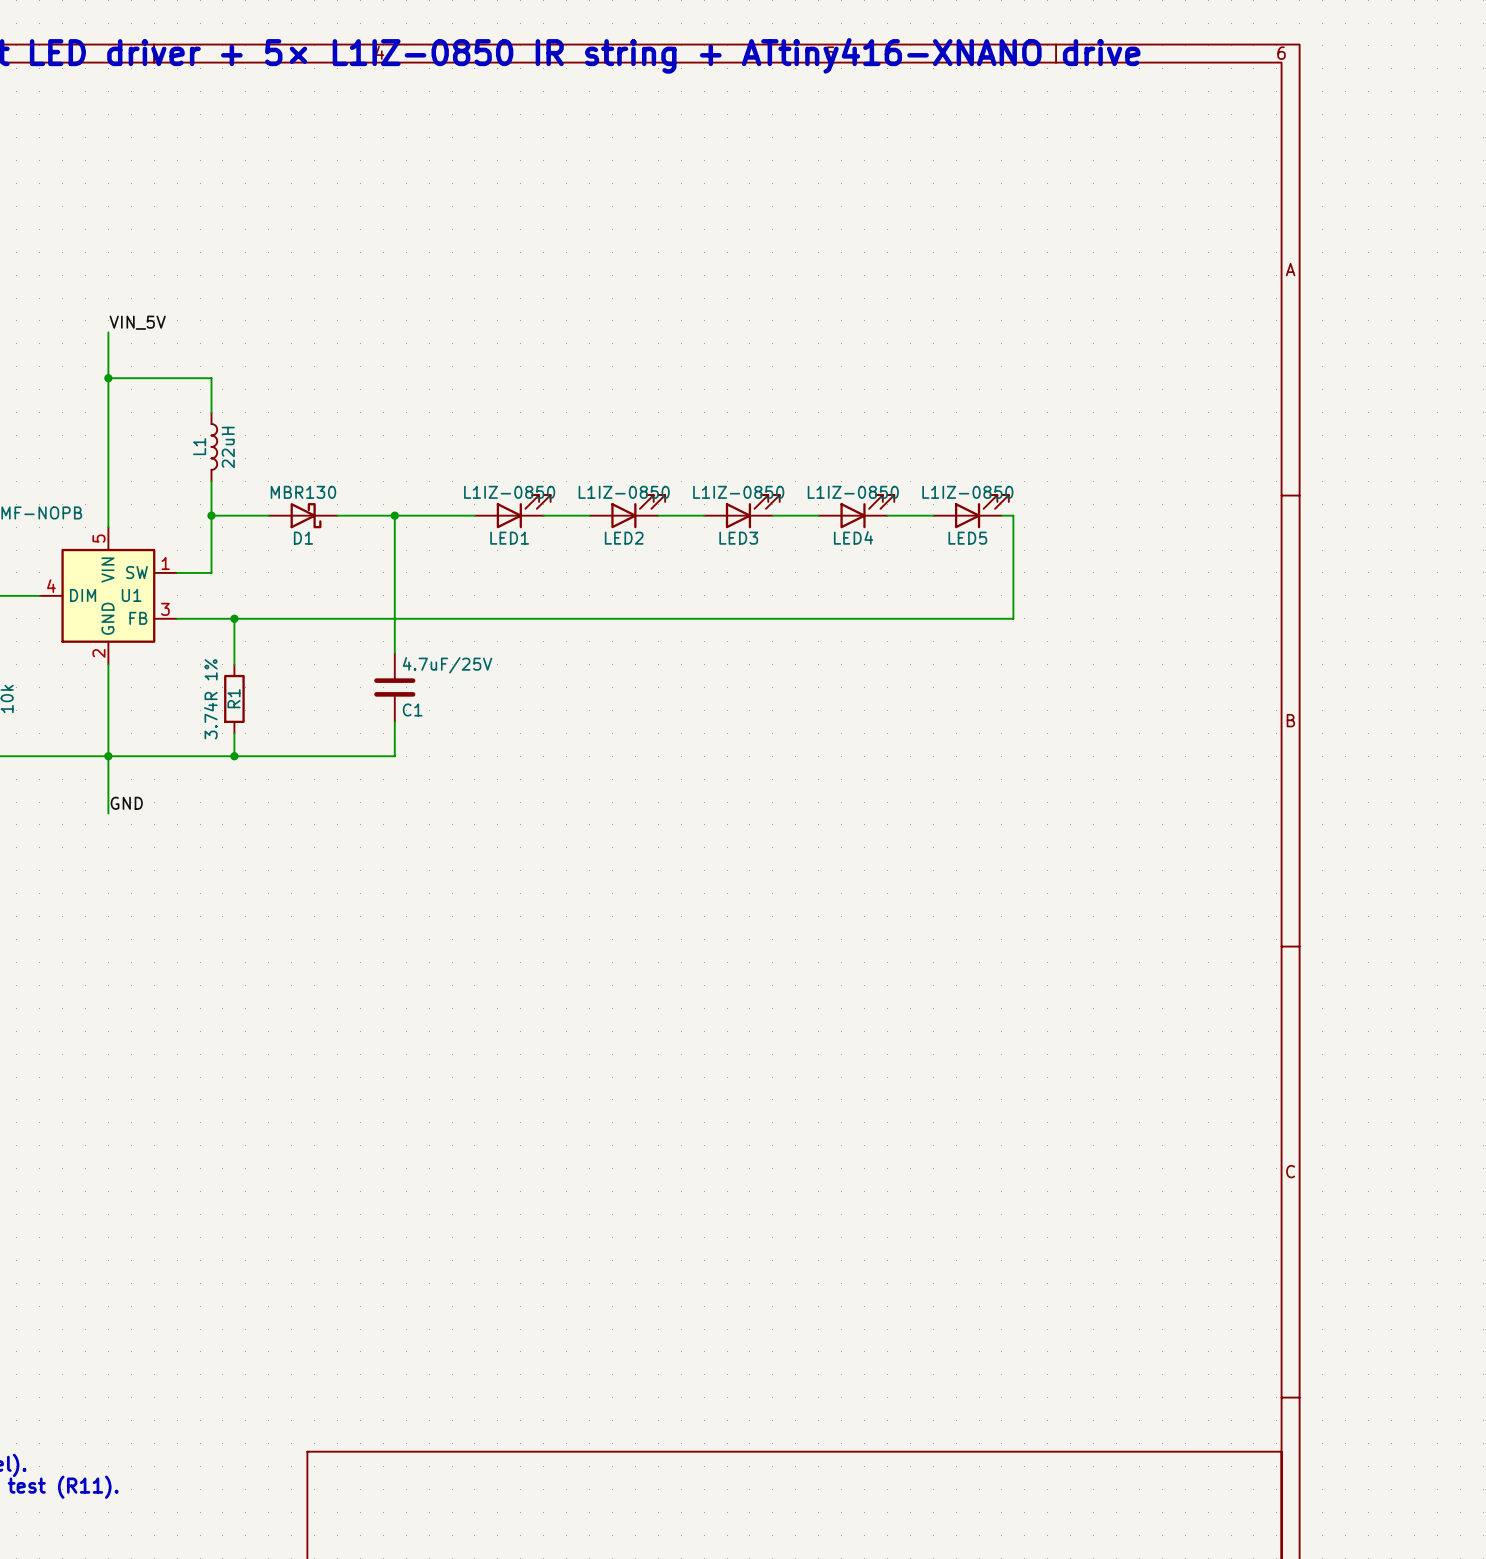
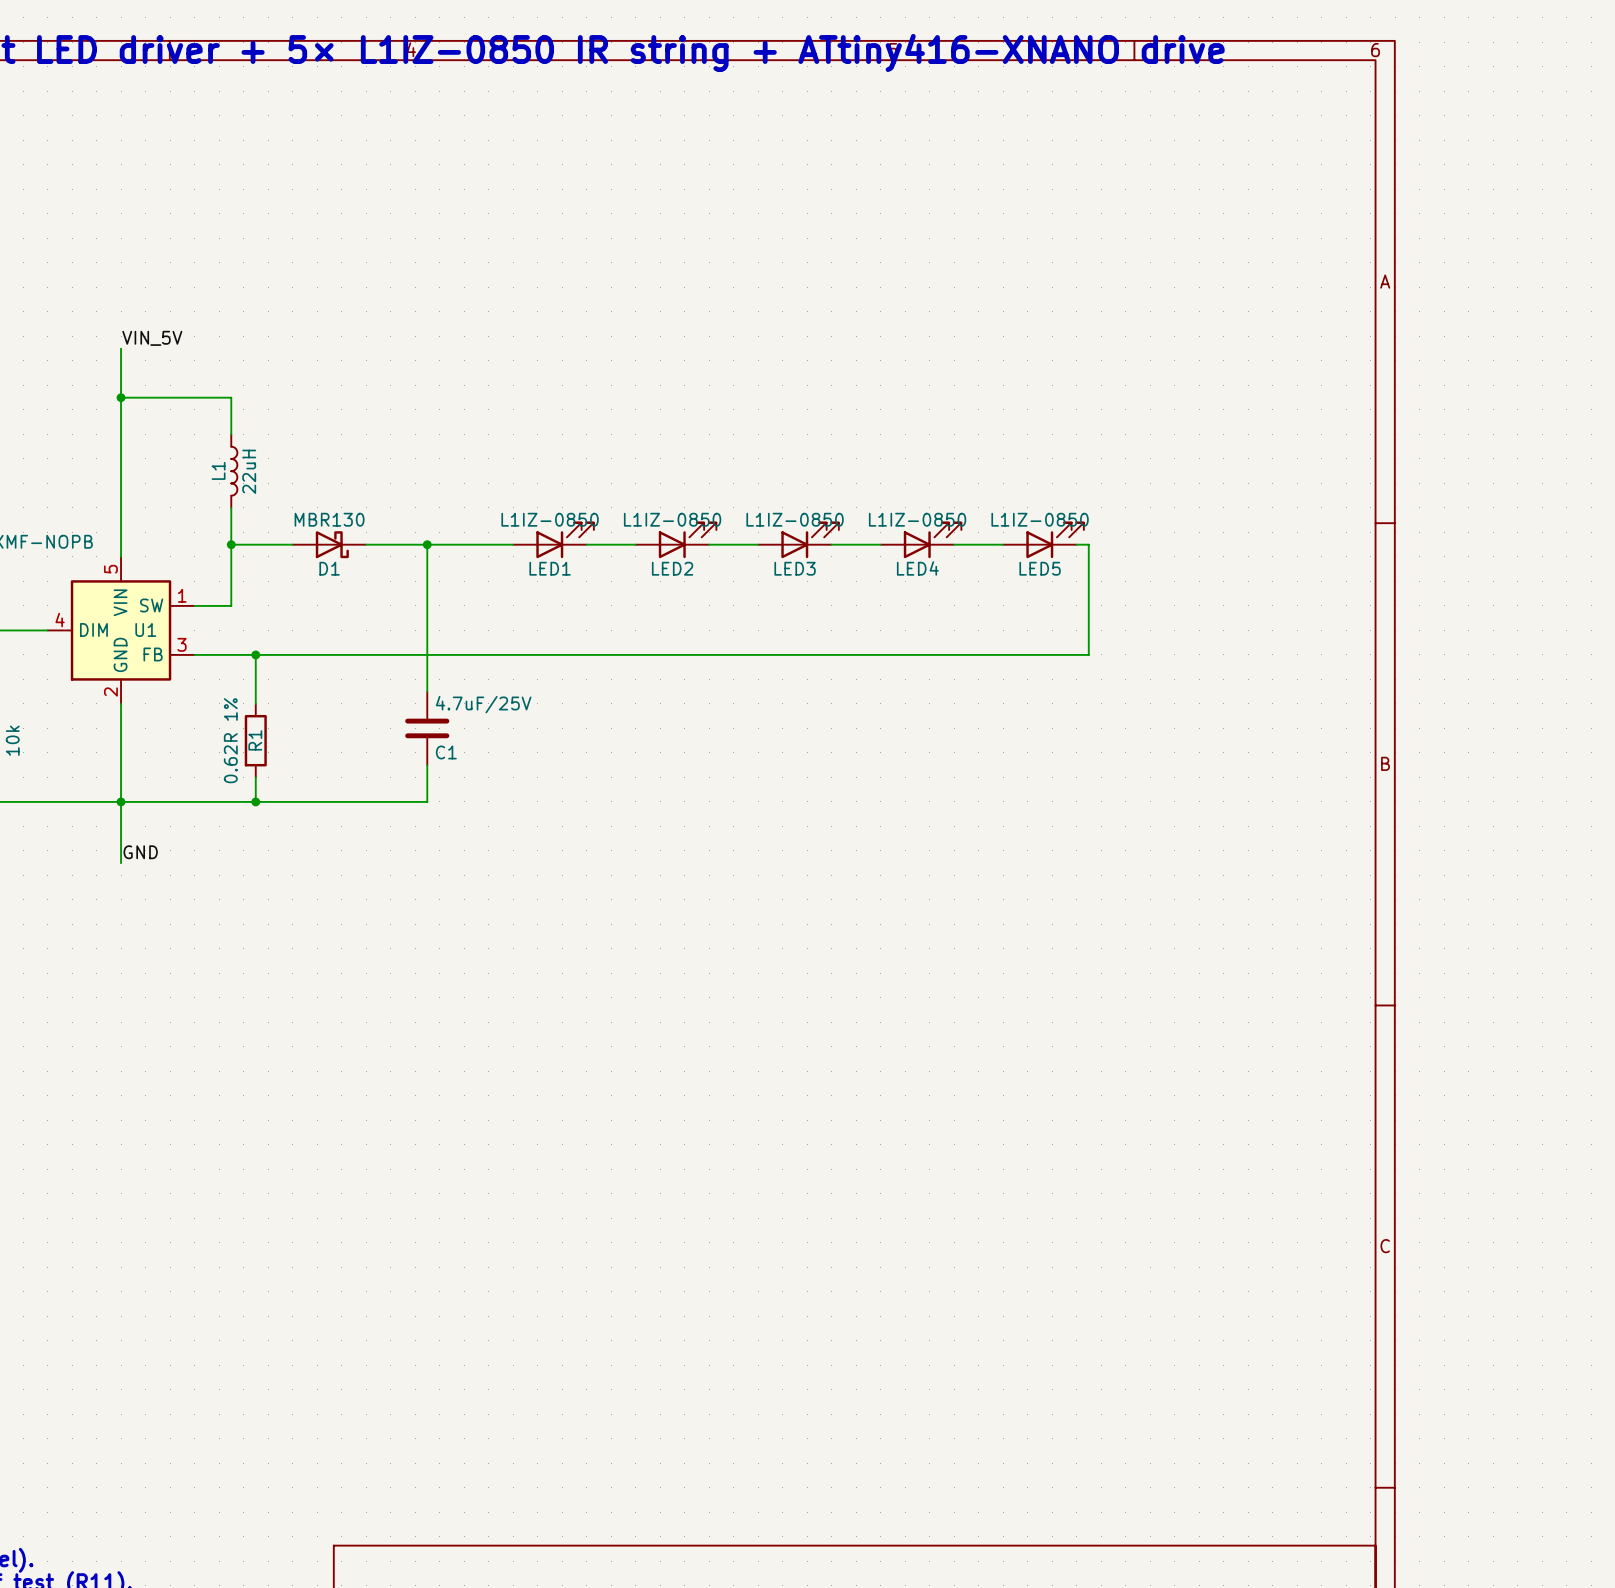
R1 value: 3.74R 1% (210, 699) -> 0.62R 1% (230, 740)

